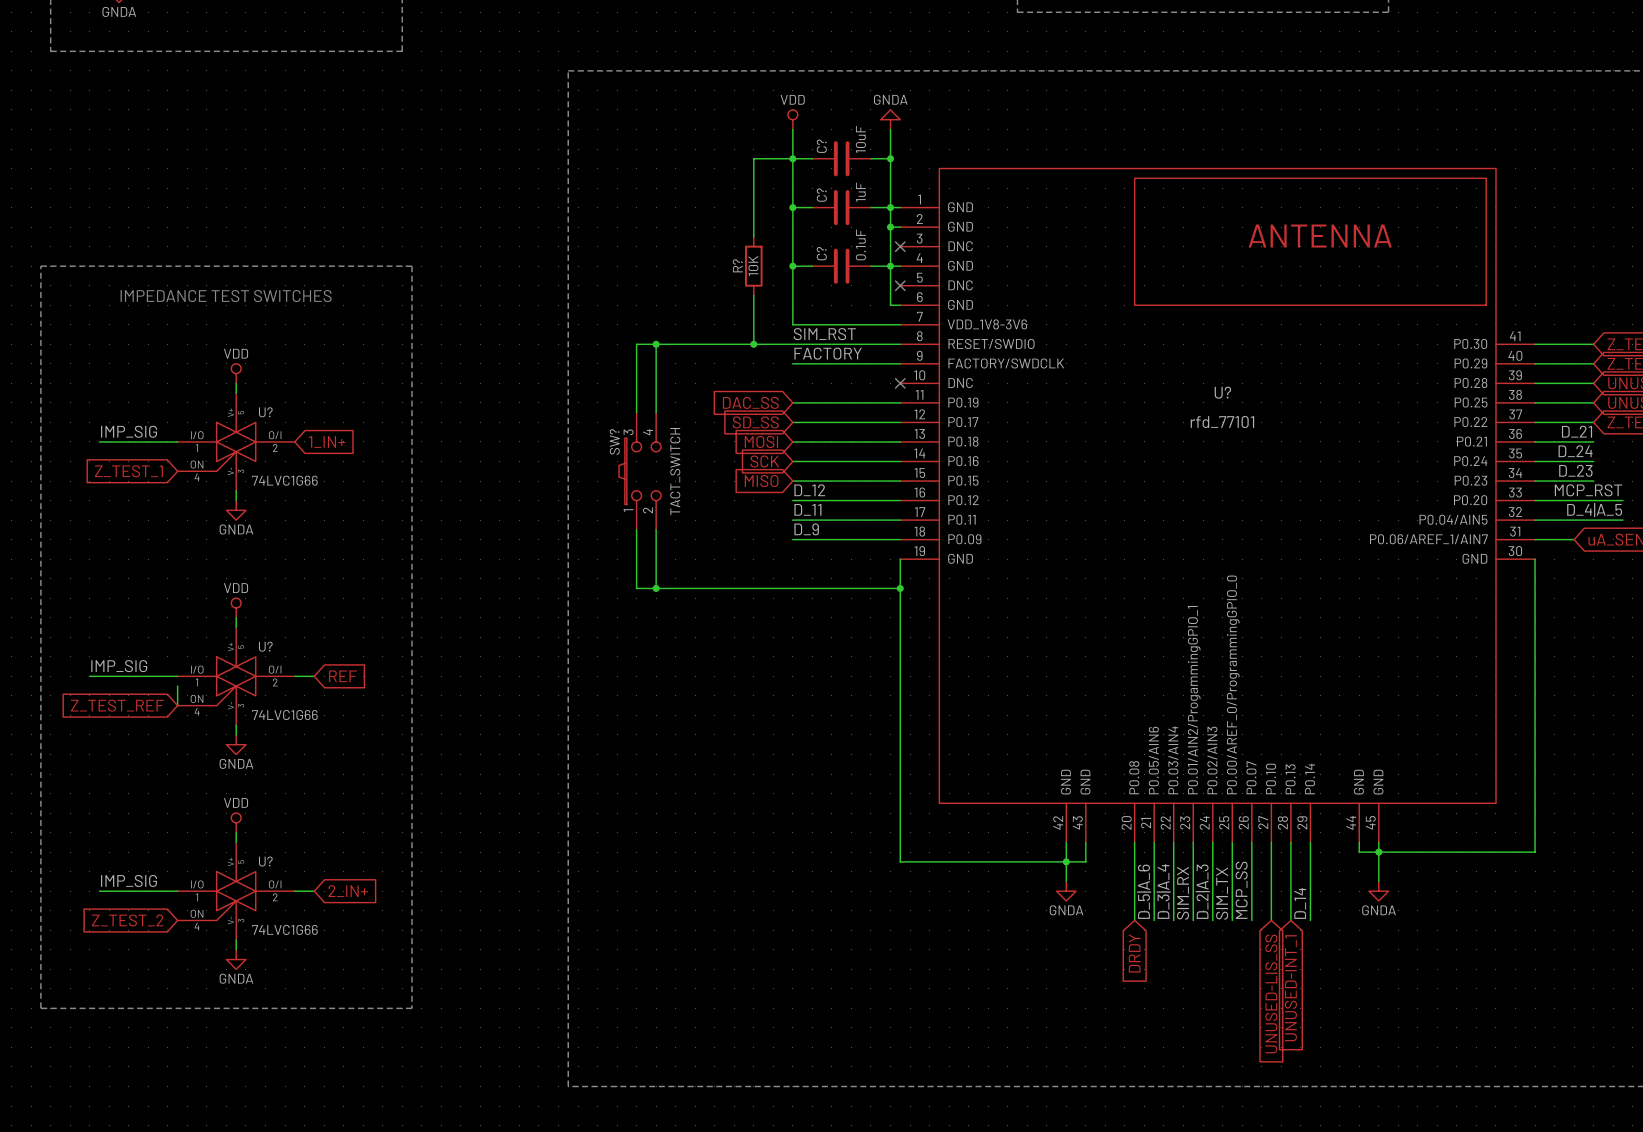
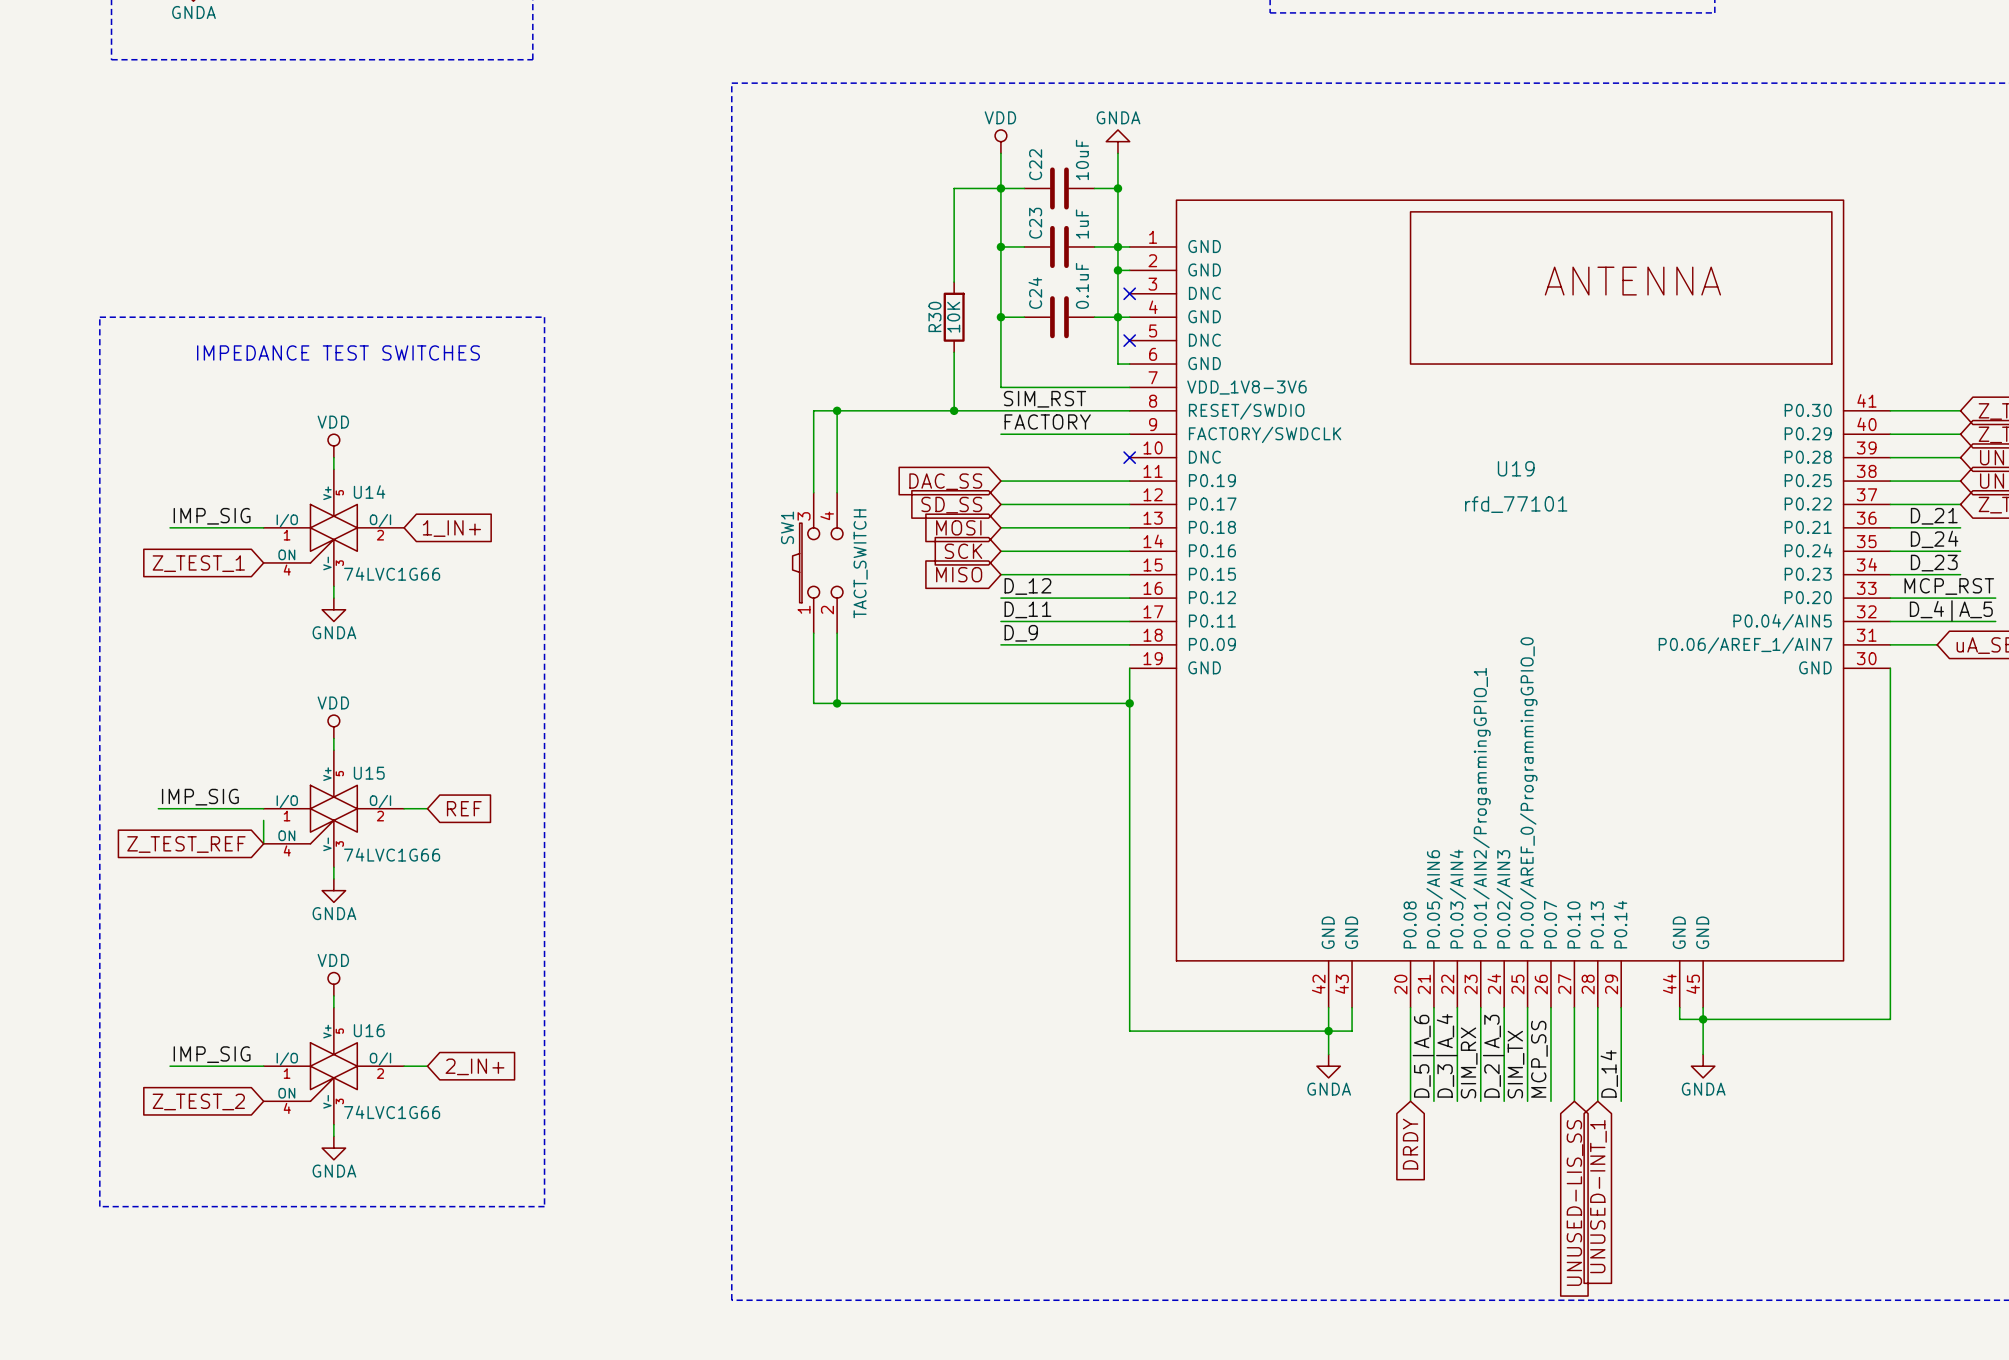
C? name: C? (821, 146) -> C22 (1035, 164)
C? name: C? (821, 195) -> C23 (1035, 223)
C? name: C? (821, 253) -> C24 (1035, 293)
R? name: R? (737, 265) -> R30 (934, 316)
U? name: U? (1222, 392) -> U19 (1516, 468)
U? name: U? (265, 412) -> U14 (369, 492)
SW? name: SW? (614, 441) -> SW1 (787, 527)
U? name: U? (265, 646) -> U15 (369, 773)
U? name: U? (265, 861) -> U16 (369, 1030)

